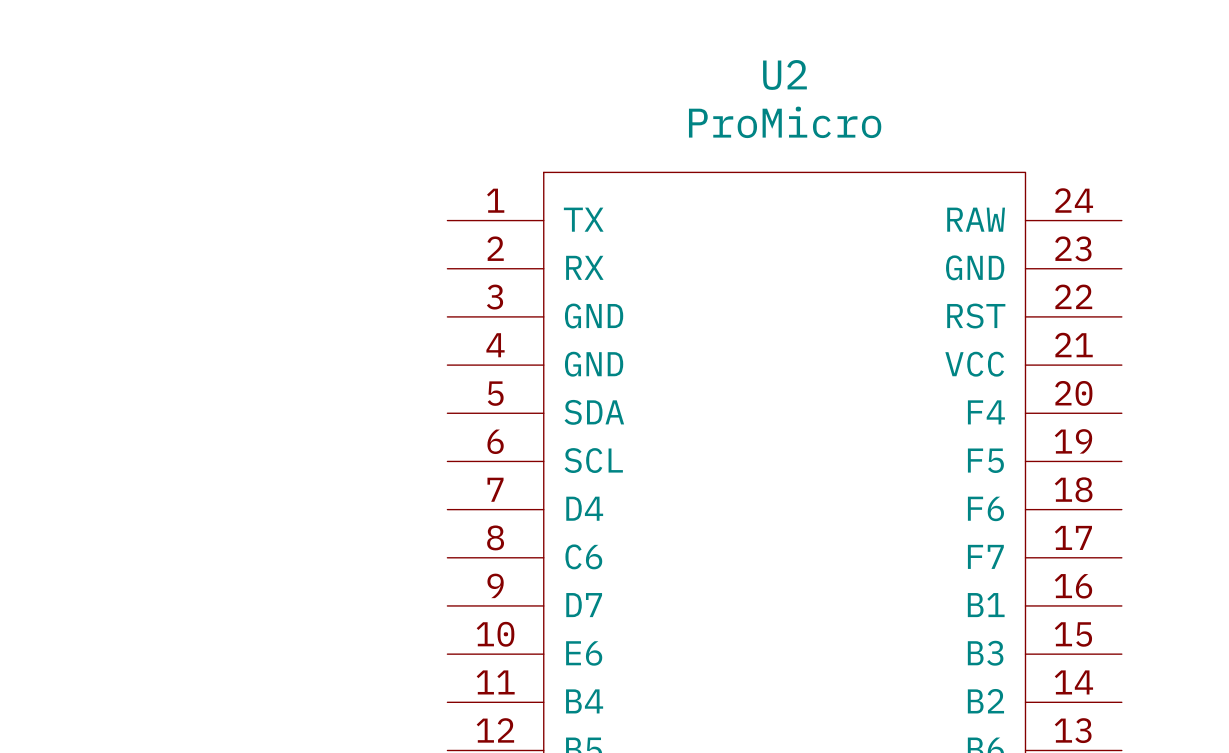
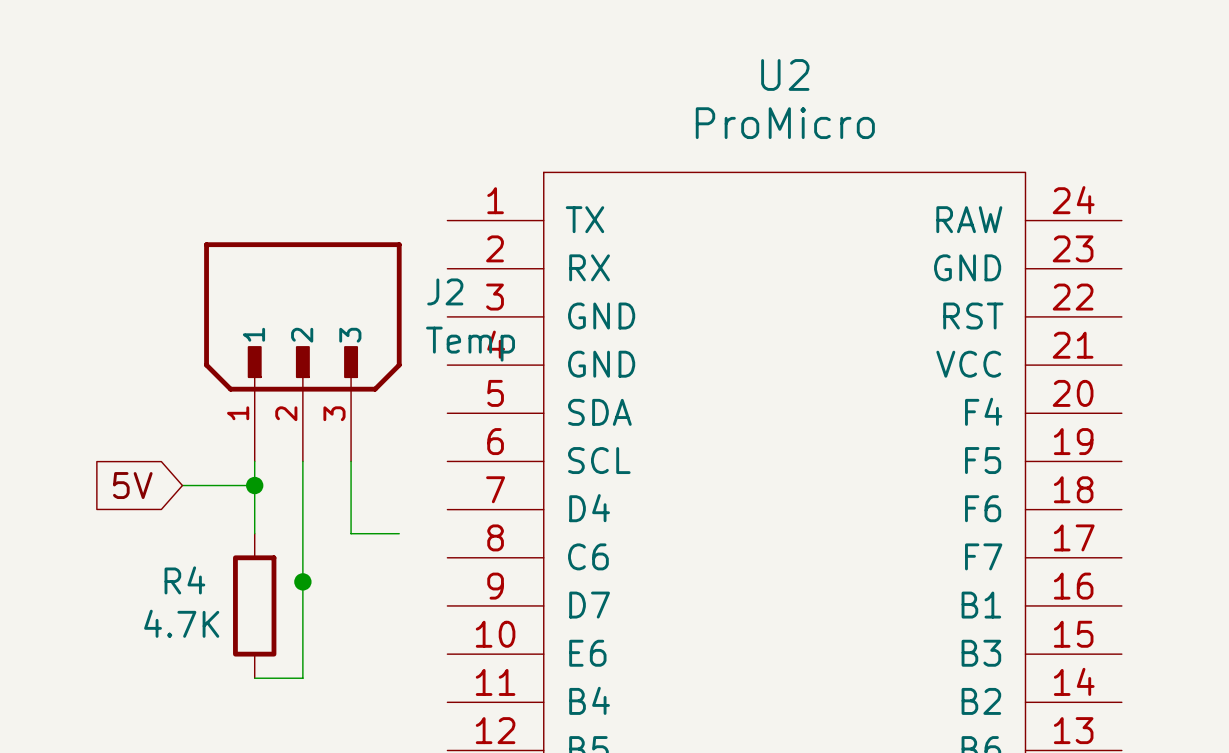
J2: none -> Temp (302, 351)
wire: none -> (254, 461) (254, 533)
wire: none -> (302, 461) (302, 678) (254, 678)
wire: none -> (351, 461) (351, 533) (399, 533)
global label: none -> 5V (132, 485)
wire: none -> (182, 485) (254, 485)
junction: none -> (254, 485)
junction: none -> (302, 581)
R4: none -> 4.7K (254, 605)

